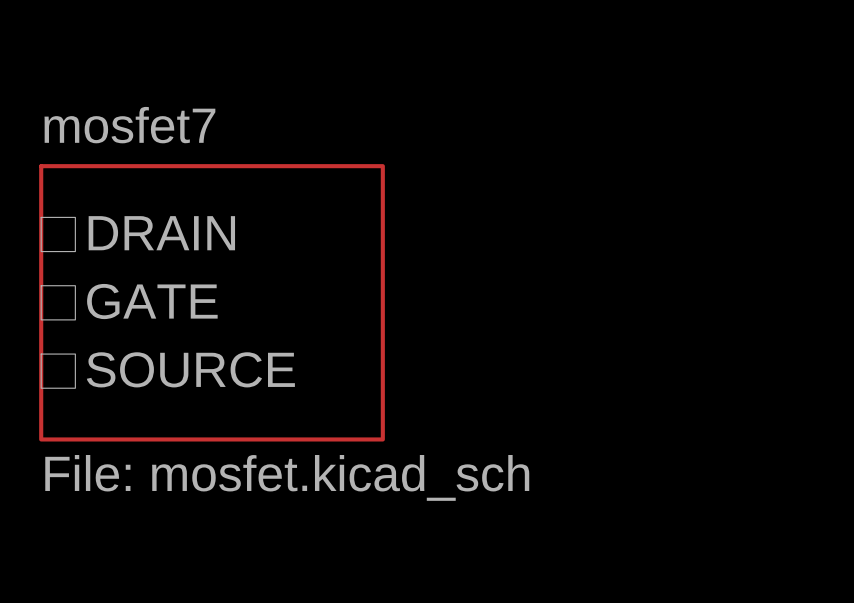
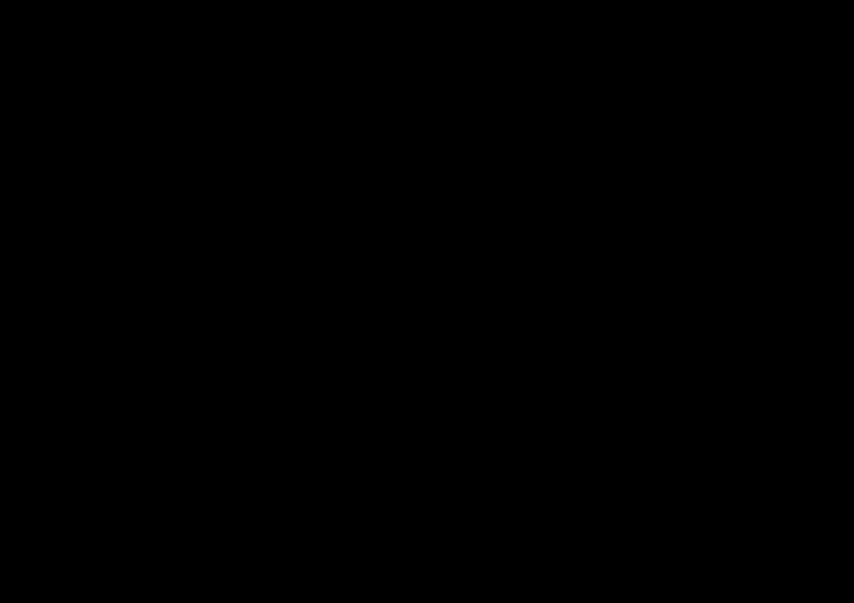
sheet pin: DRAIN (161, 233) -> none
sheet pin: GATE (152, 301) -> none
sheet mosfet7: File: mosfet.kicad_sch (212, 302) -> none
sheet pin: SOURCE (190, 369) -> none

